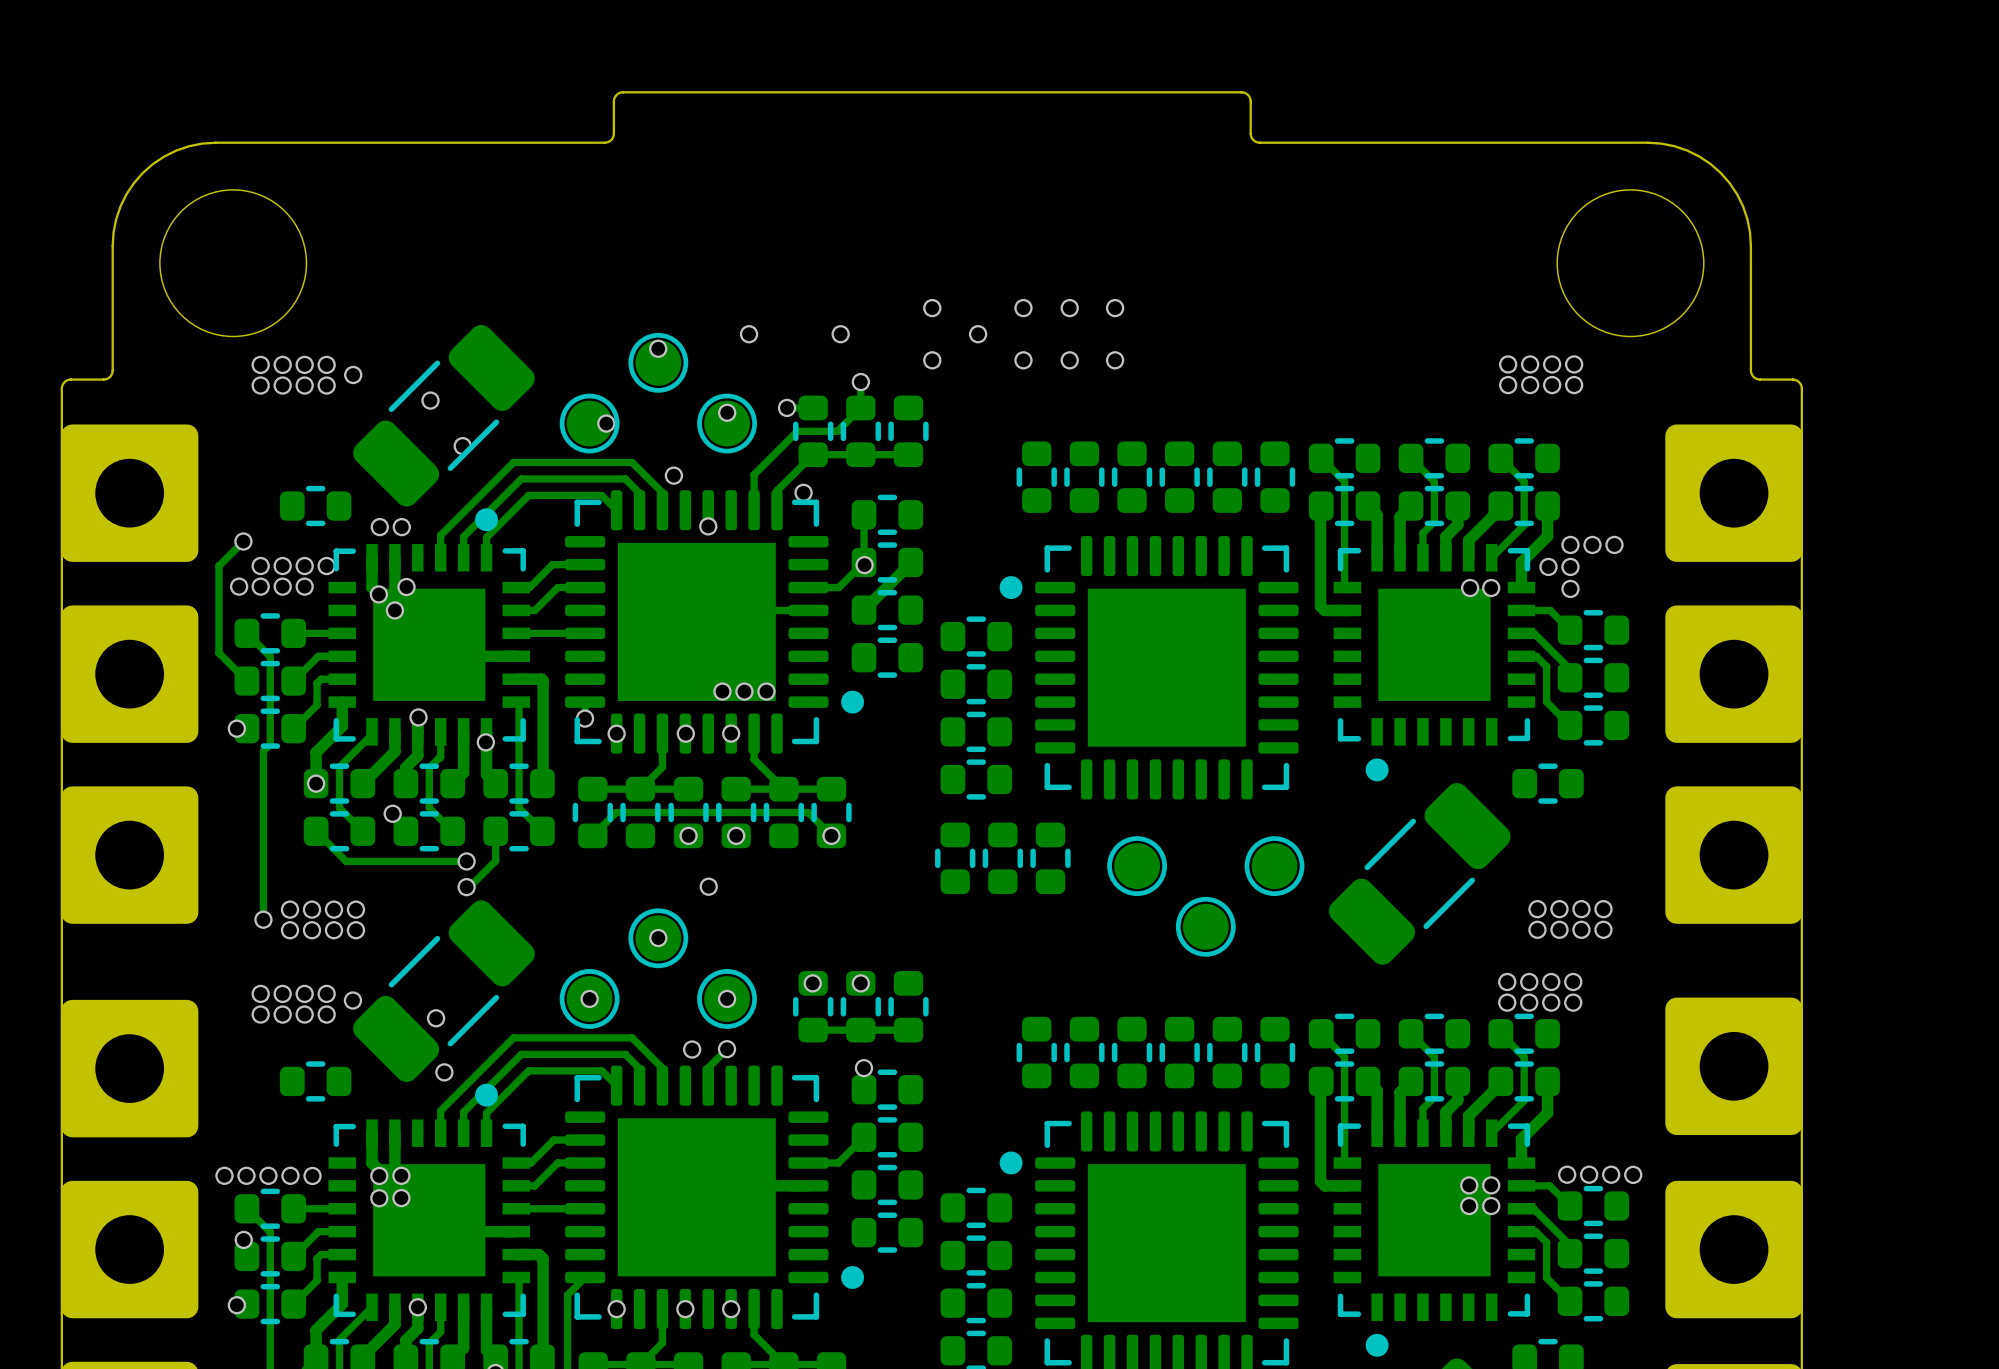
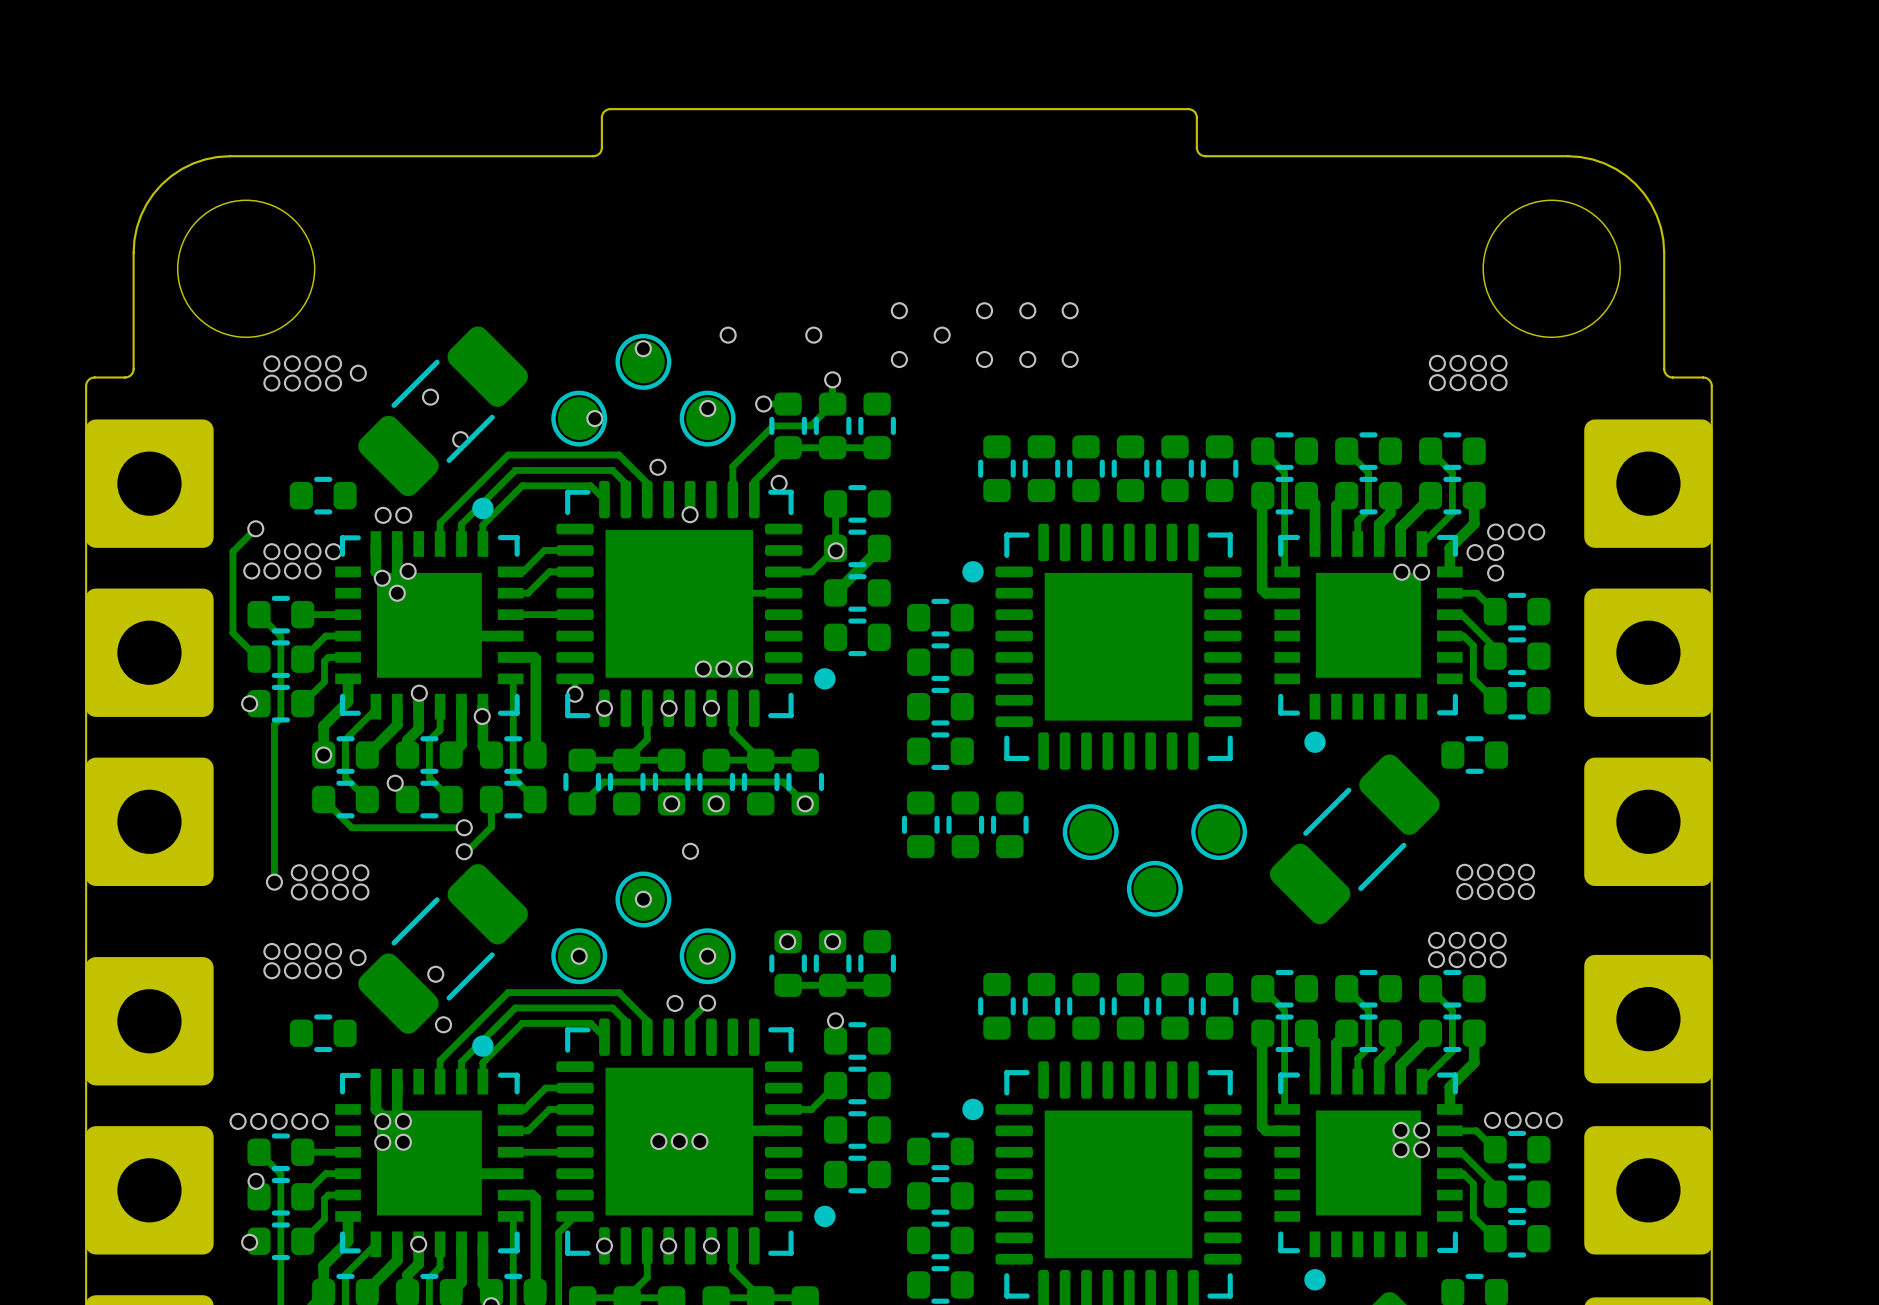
via: none -> (658, 1141)
via: none -> (679, 1141)
via: none -> (699, 1141)

